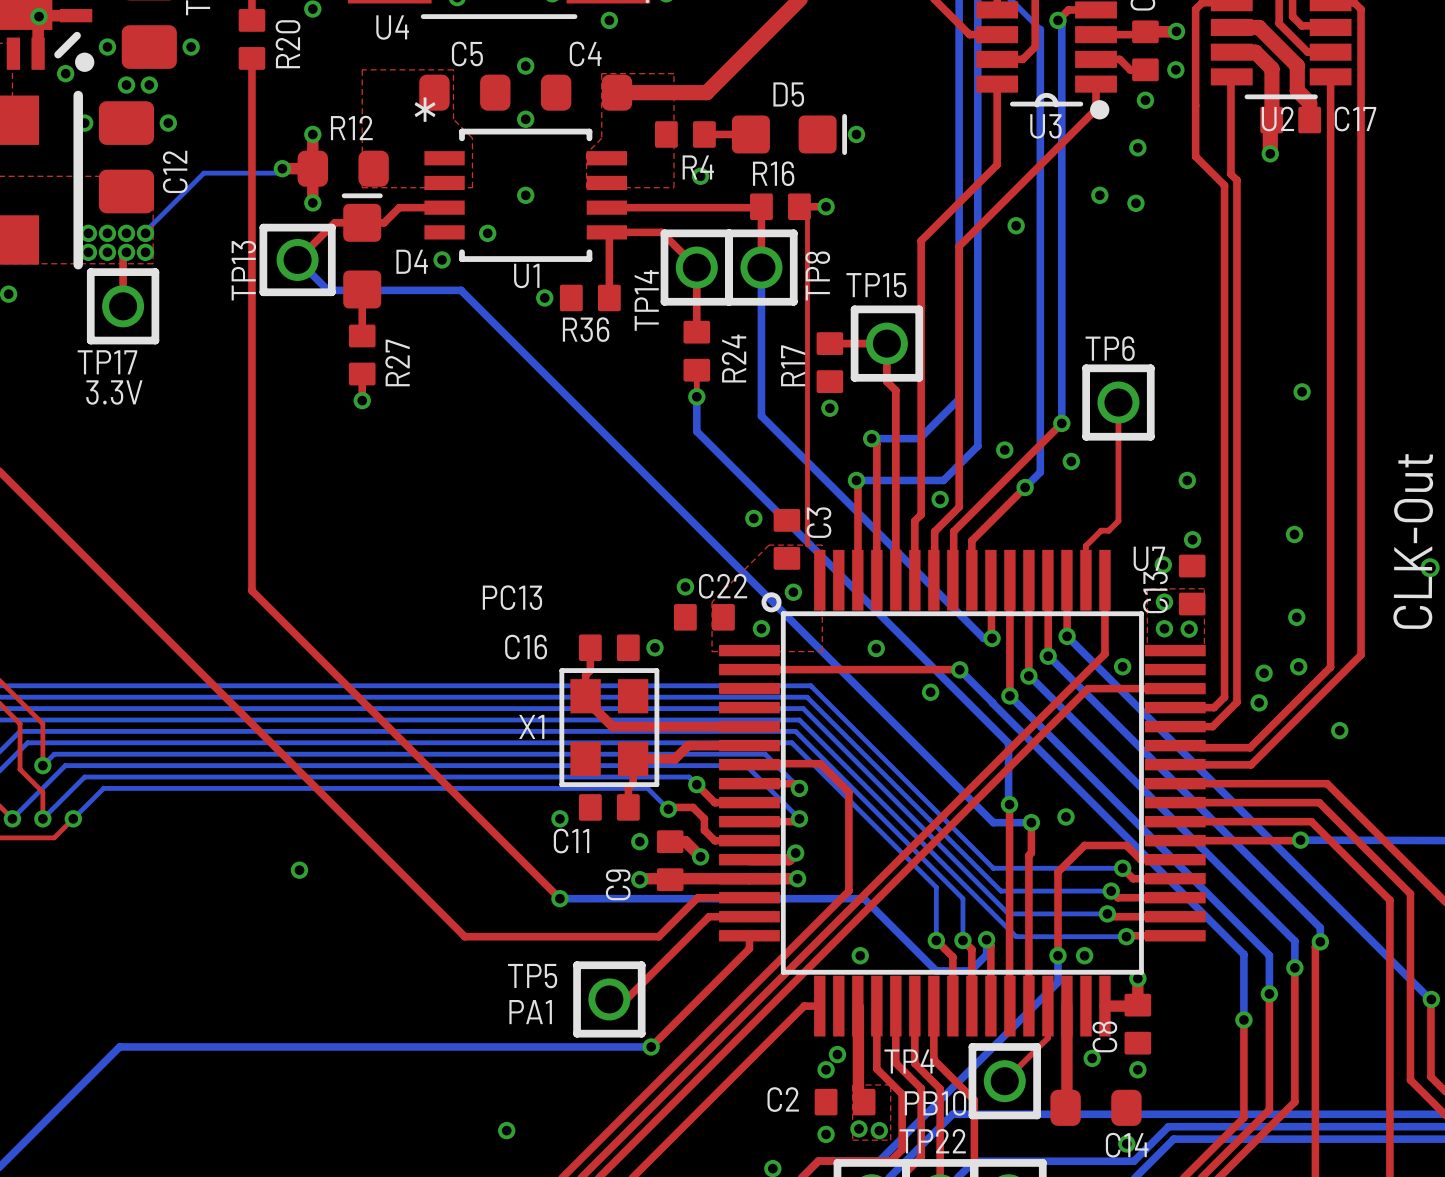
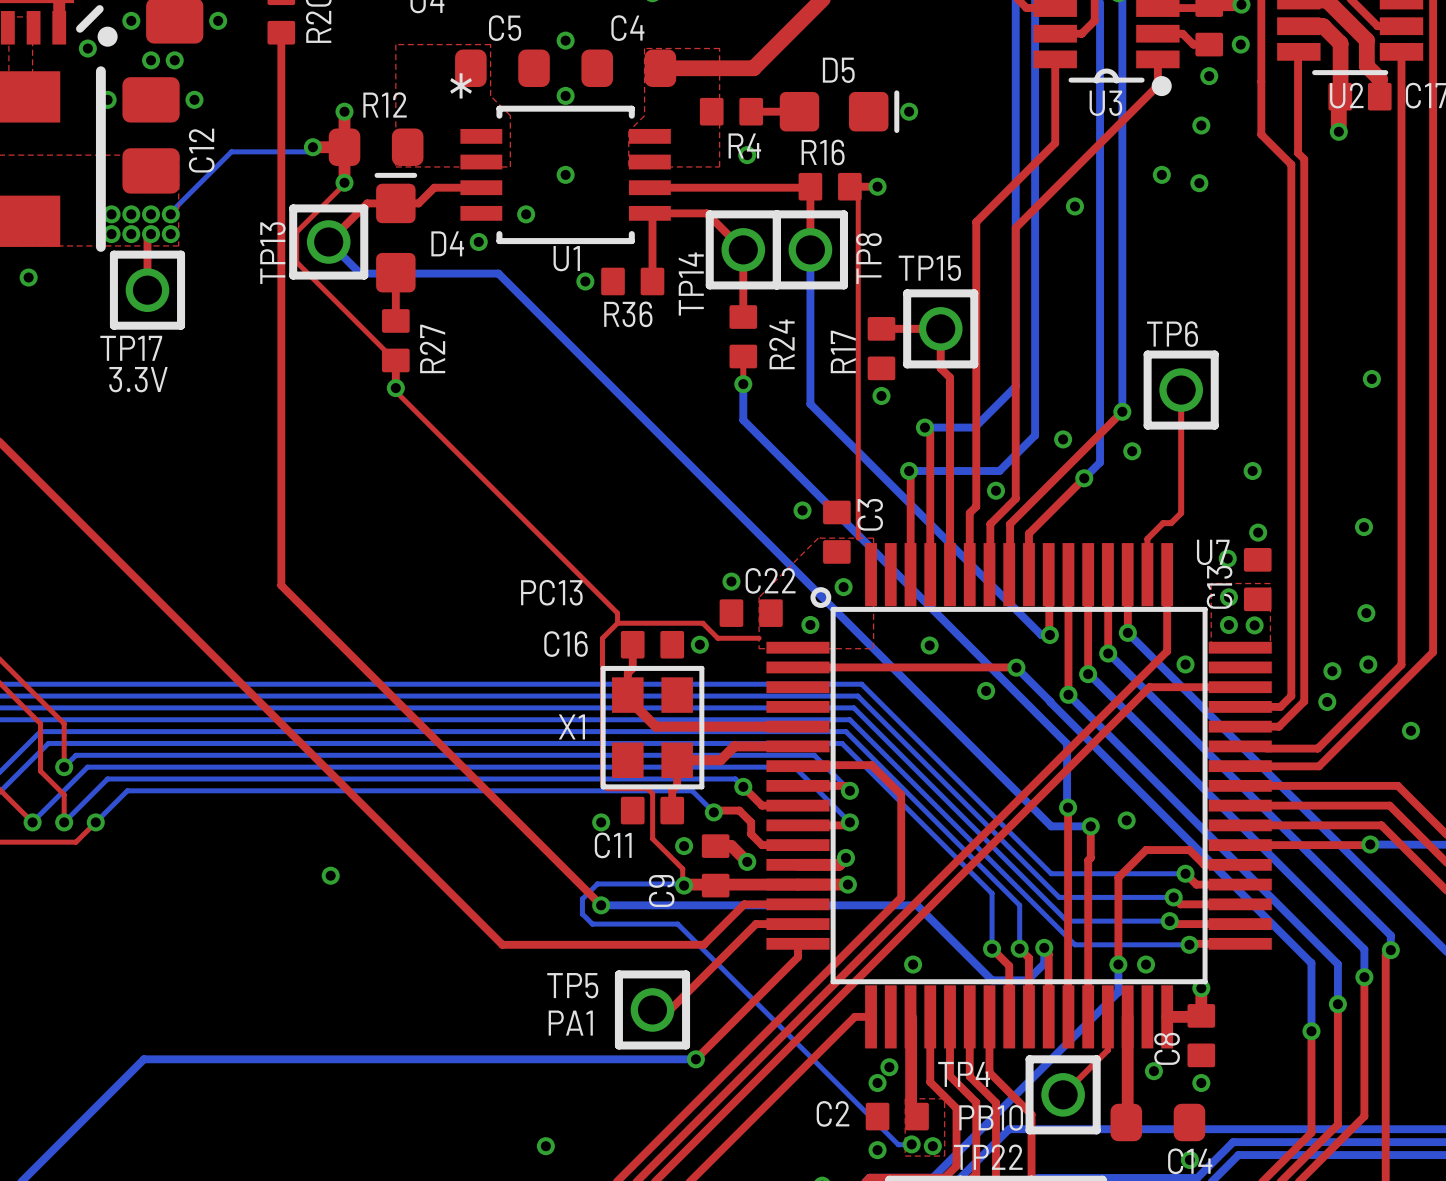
top track: none -> (341, 186) (296, 232) (296, 262) (391, 357)
top track: none -> (396, 392) (617, 613) (617, 623)
top track: none -> (617, 623) (602, 638) (602, 783) (607, 788) (647, 788) (652, 793) (652, 838) (682, 868) (682, 878)
top track: none -> (617, 623) (702, 623) (717, 638) (759, 638)
bottom track: none -> (684, 885) (682, 883) (597, 883) (582, 899) (582, 914) (592, 924) (677, 924) (898, 1144) (911, 1144)

